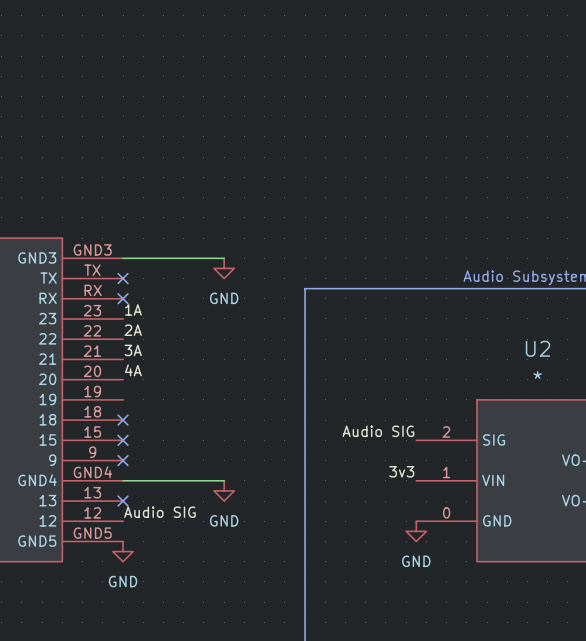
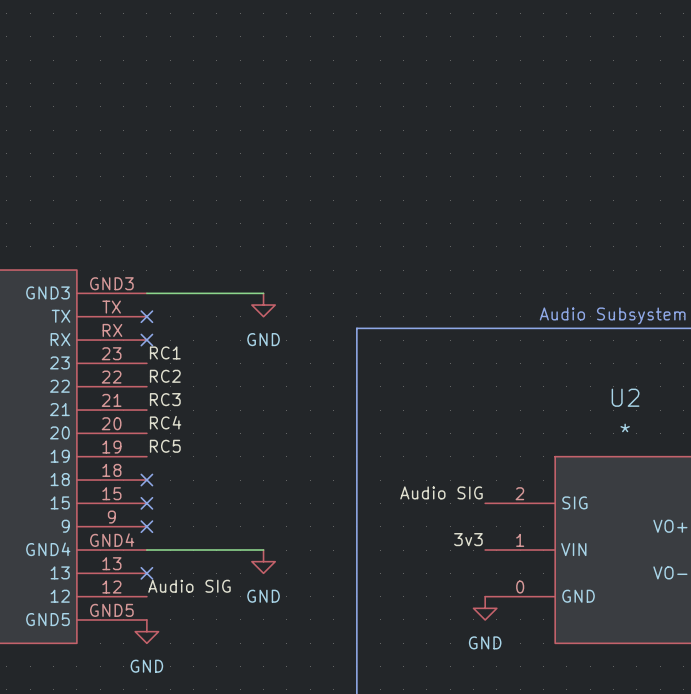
label: 1A (133, 309) -> RC1 (165, 352)
label: 2A (133, 330) -> RC2 (165, 376)
label: 3A (133, 350) -> RC3 (165, 399)
label: 4A (133, 370) -> RC4 (165, 422)
label: none -> RC5 (165, 446)

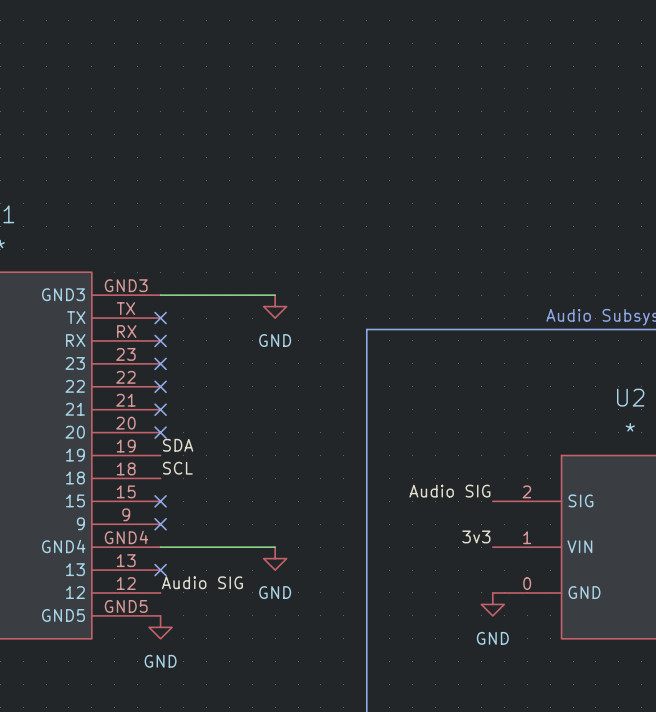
label: RC1 (165, 352) -> none
no-connect mark: none -> (160, 363)
label: RC2 (165, 376) -> none
no-connect mark: none -> (160, 386)
label: RC3 (165, 399) -> none
no-connect mark: none -> (160, 409)
label: RC4 (165, 422) -> none
no-connect mark: none -> (160, 432)
label: RC5 (165, 446) -> SDA (178, 445)
label: none -> SCL (177, 468)
no-connect mark: (146, 480) -> none

